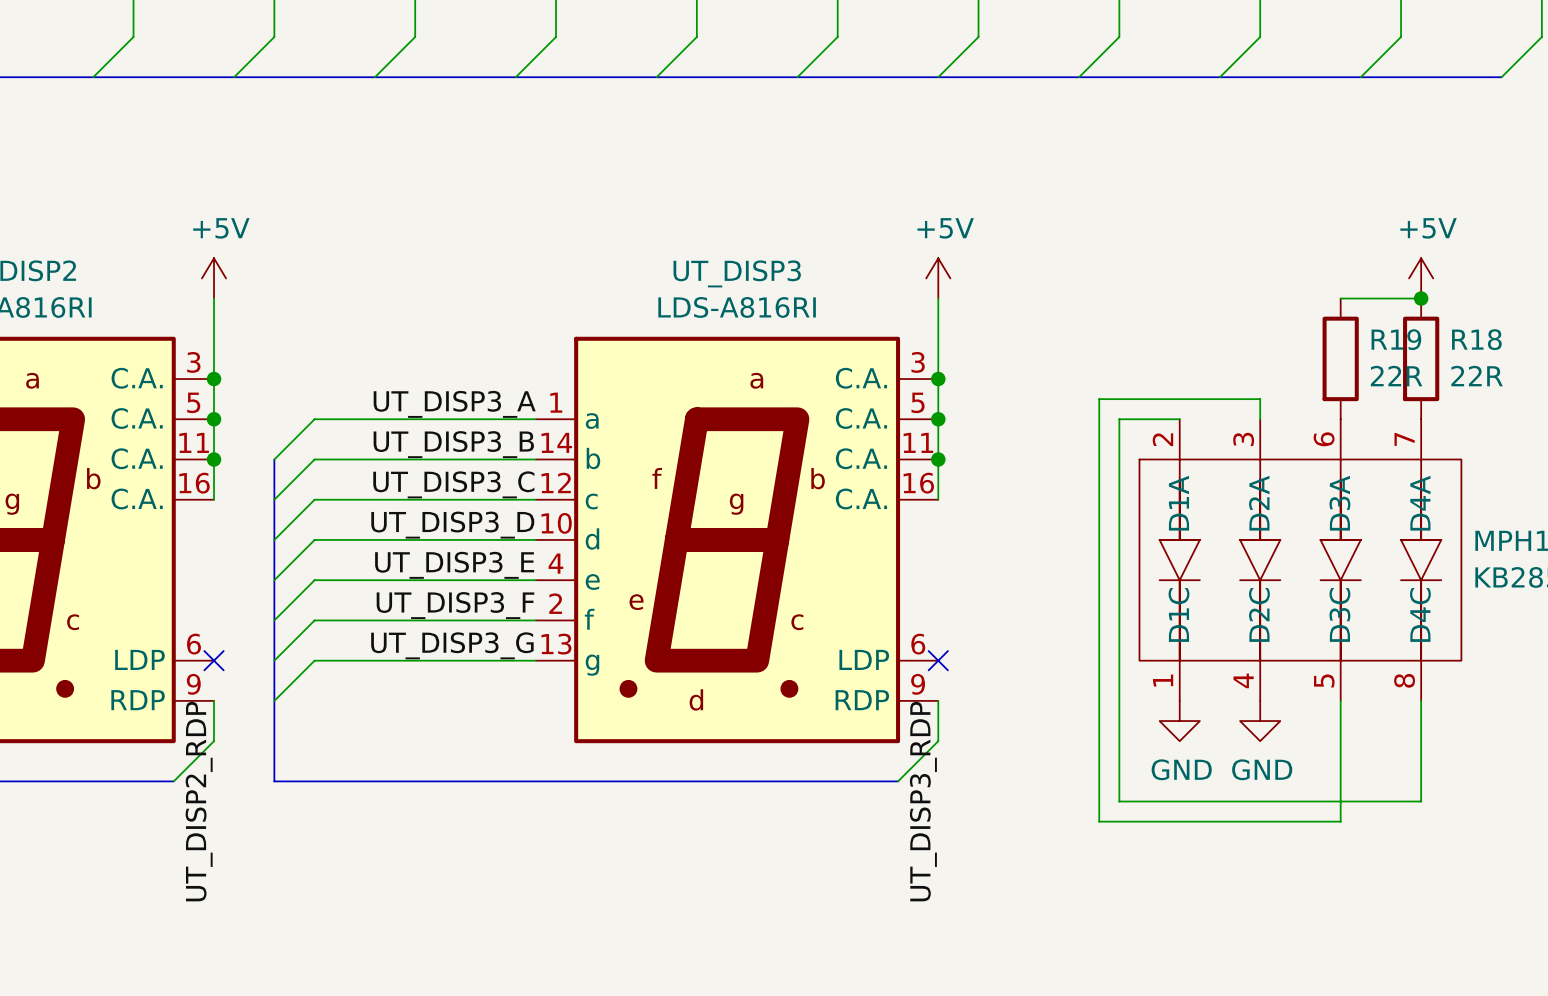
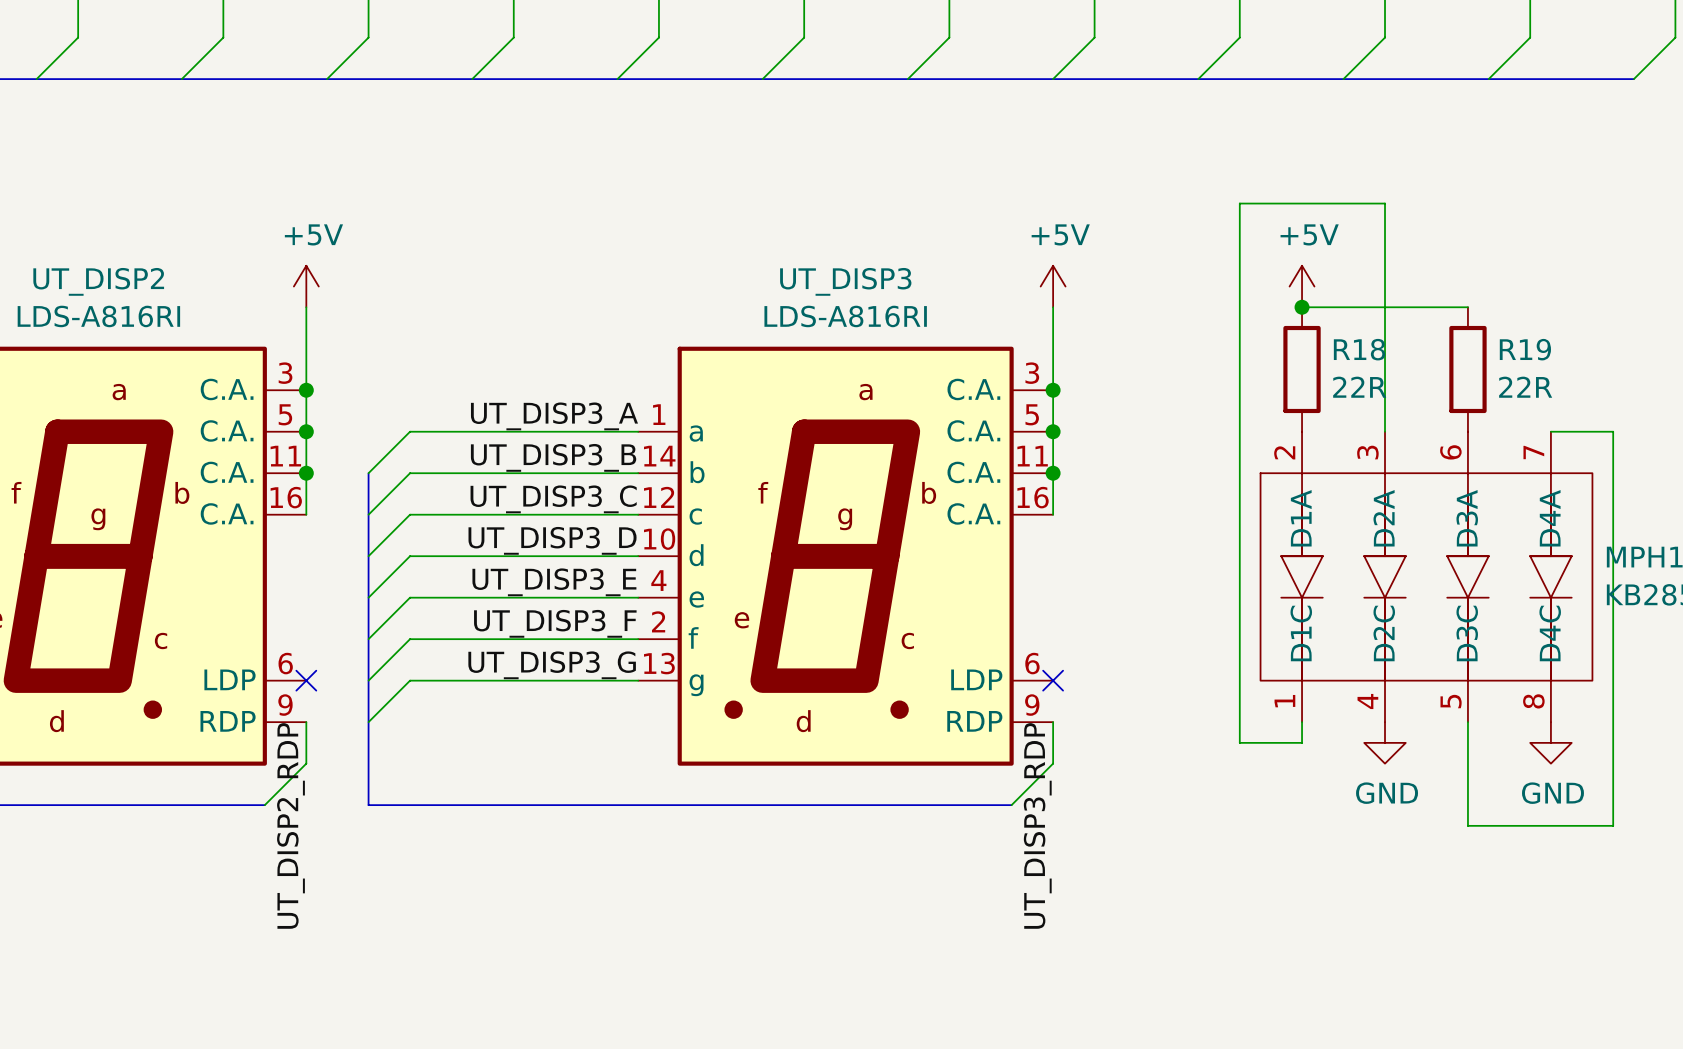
power symbol position: +5V (1421, 278) -> +5V (1302, 286)
junction: none -> (1302, 307)
wire: (1340, 298) (1421, 298) -> (1467, 307) (1302, 307)
junction: (1421, 298) -> none
R18 position: (1421, 358) -> (1302, 369)
wire: (1260, 399) (1099, 399) (1099, 821) (1340, 821) (1340, 801) (1119, 801) (1119, 721) -> (1302, 722) (1302, 742) (1239, 742)
wire: (1119, 419) (1179, 419) -> (1239, 431) (1239, 203) (1385, 203) (1385, 410)
wire: (1421, 700) (1421, 801) -> (1550, 431) (1613, 431) (1613, 825) (1550, 825)
power symbol position: GND (1179, 721) -> GND (1550, 742)

